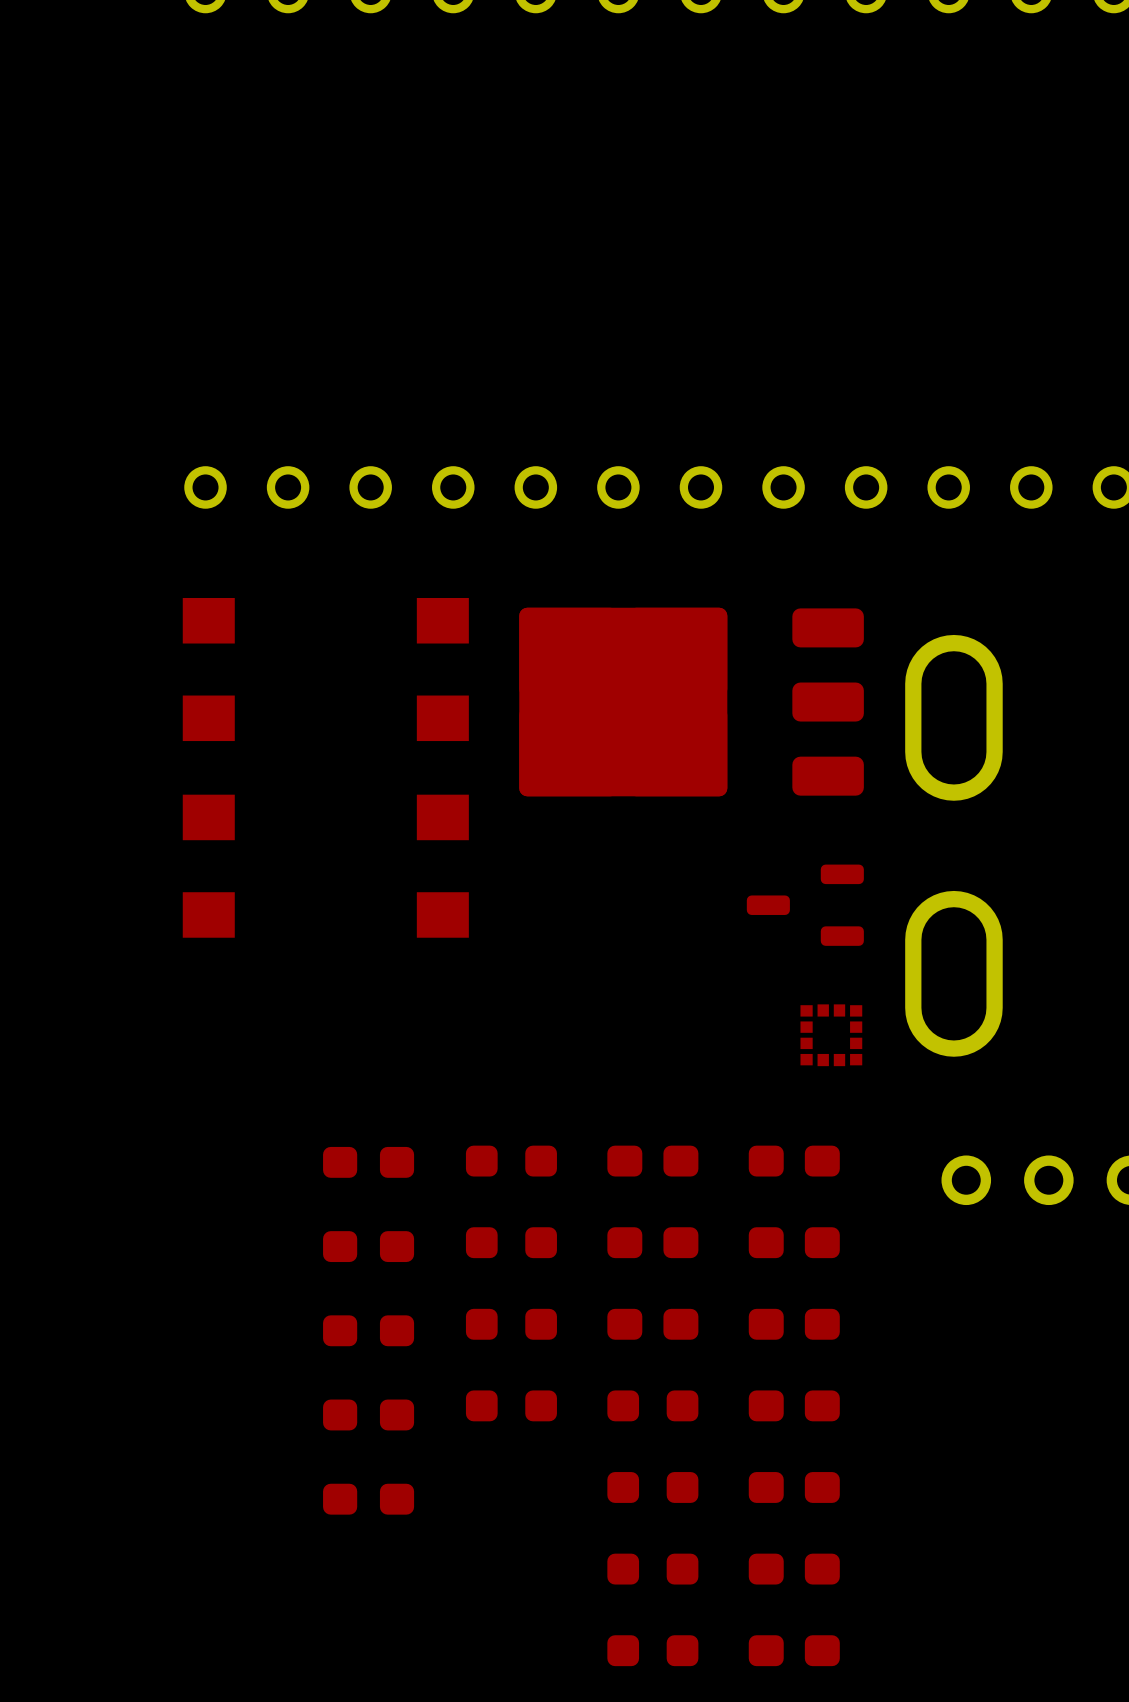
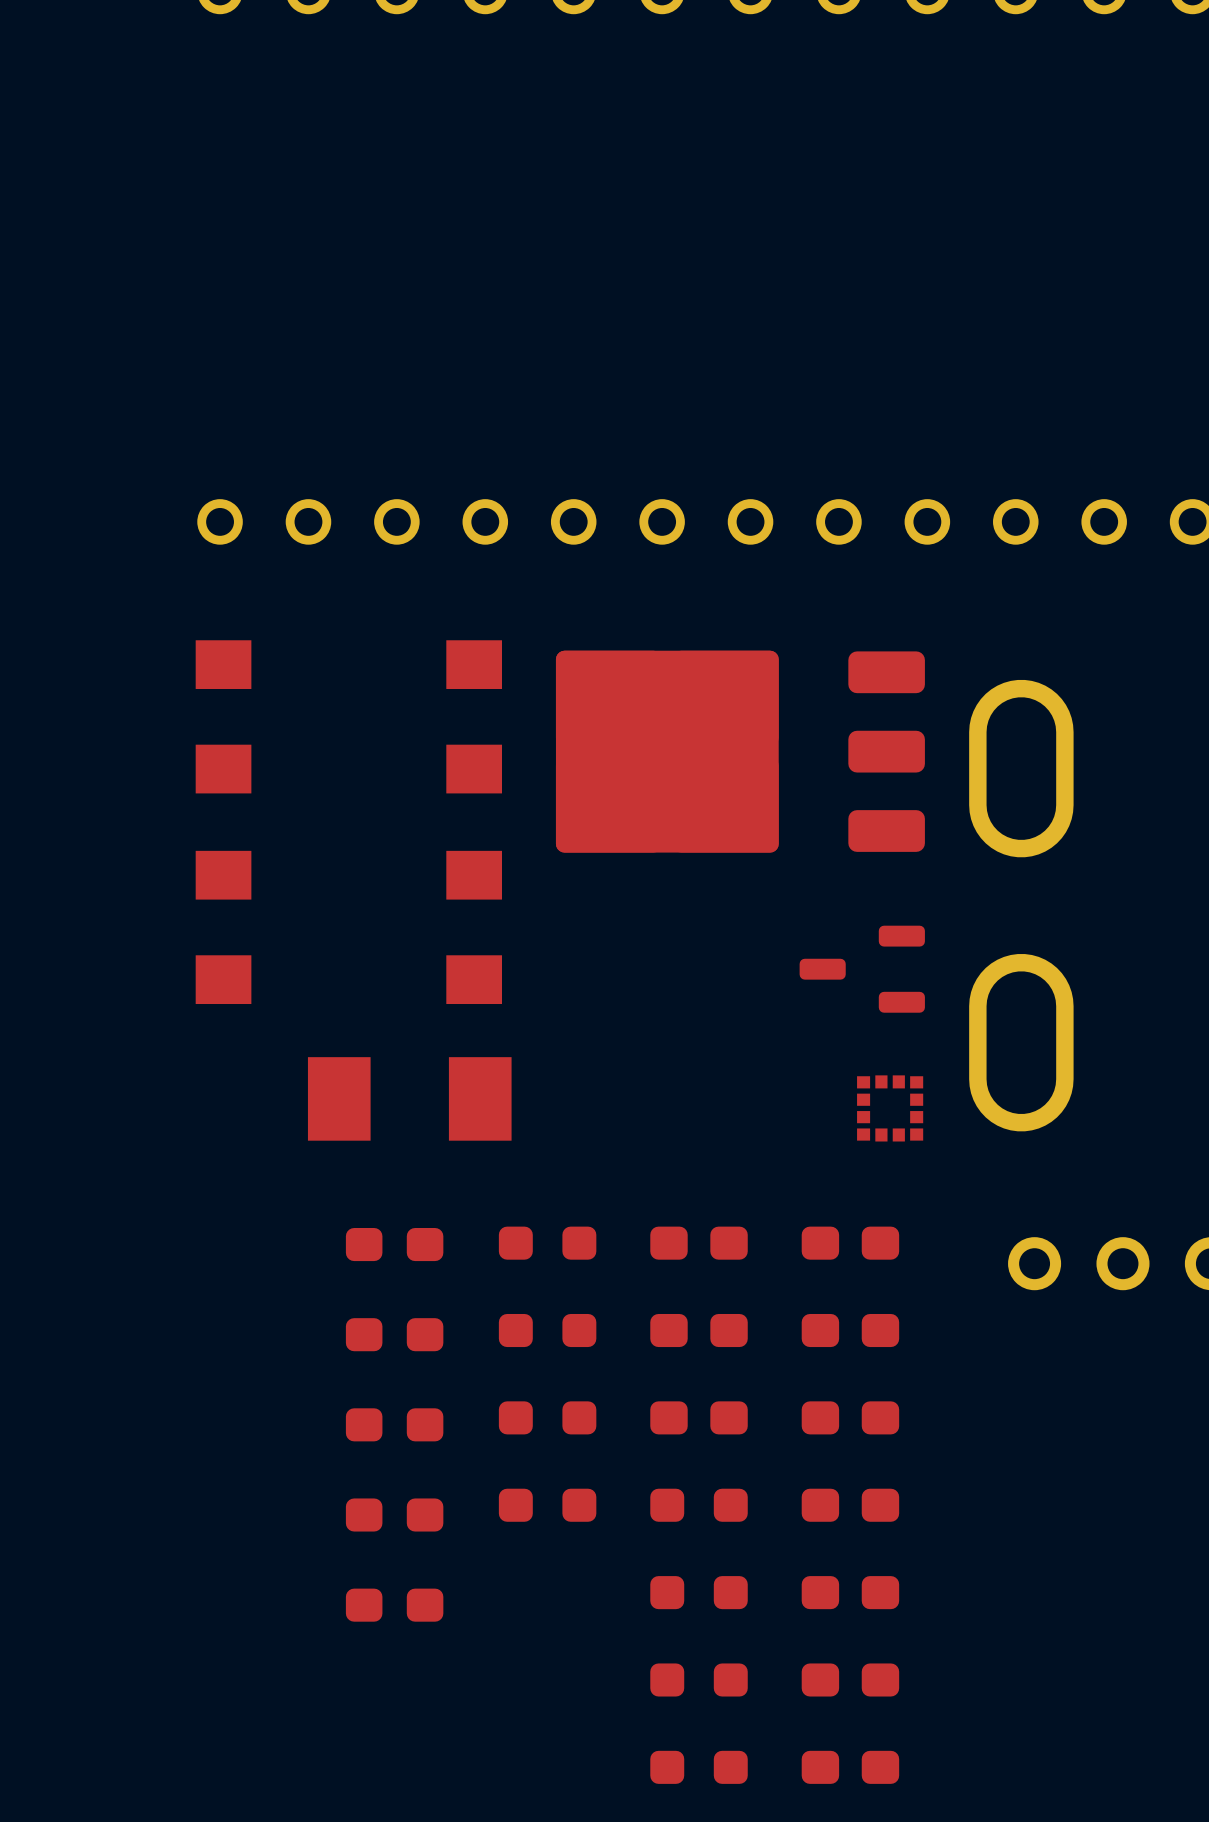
part: none -> (409, 1098)

